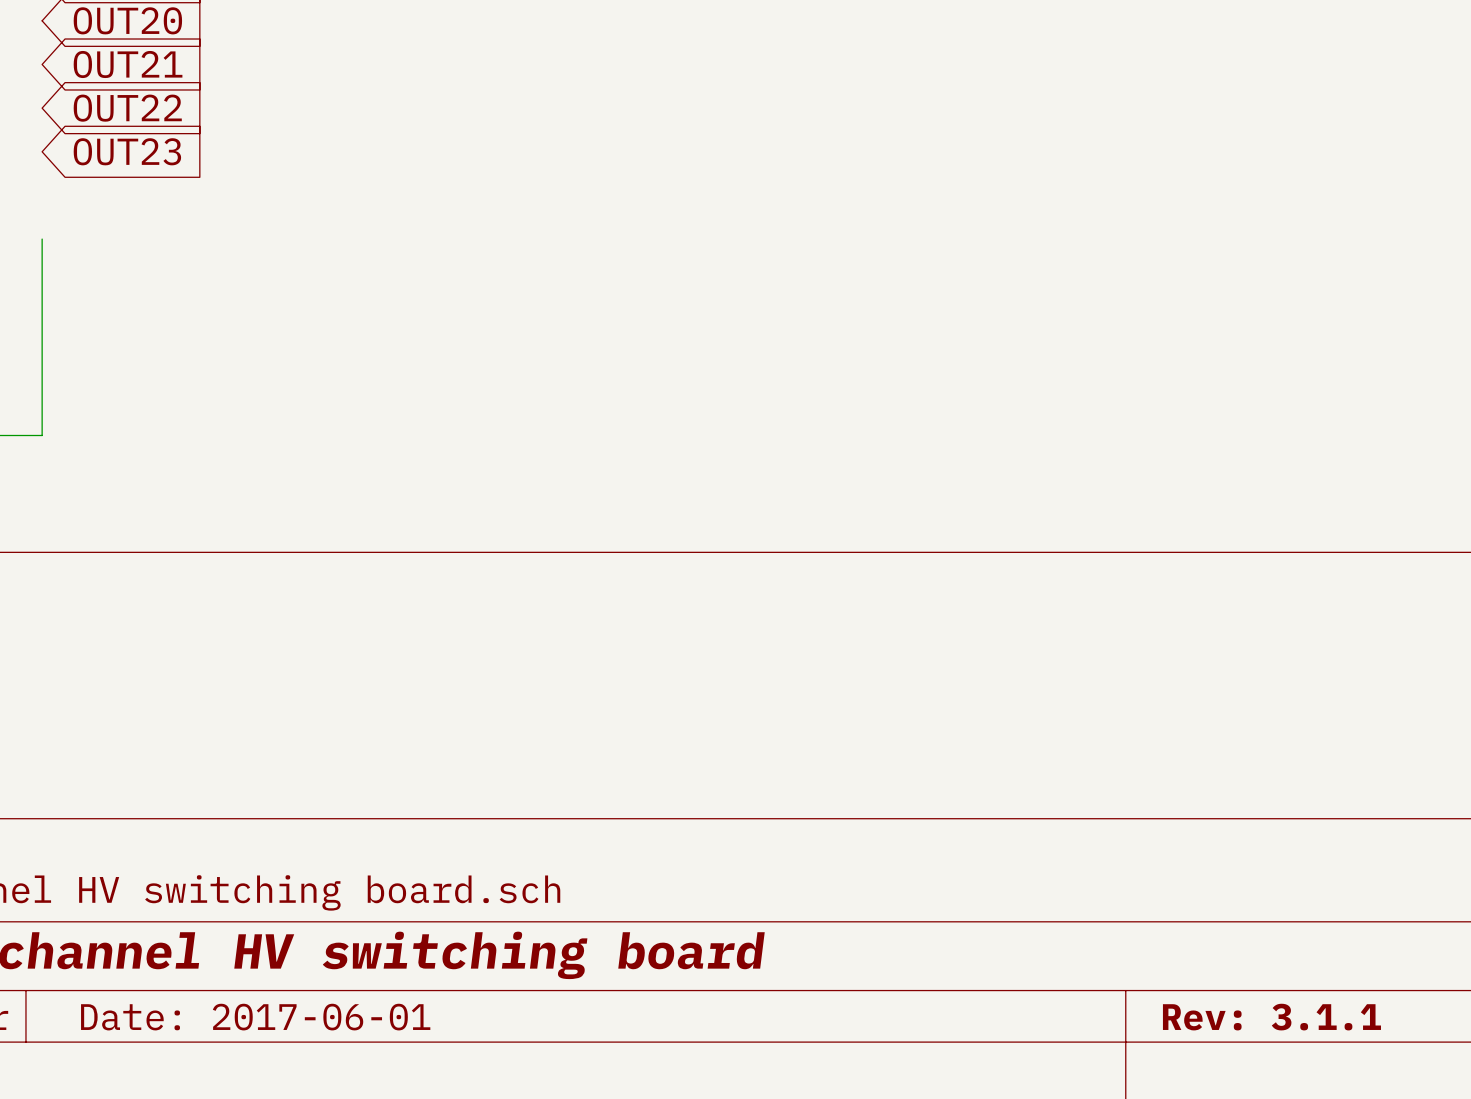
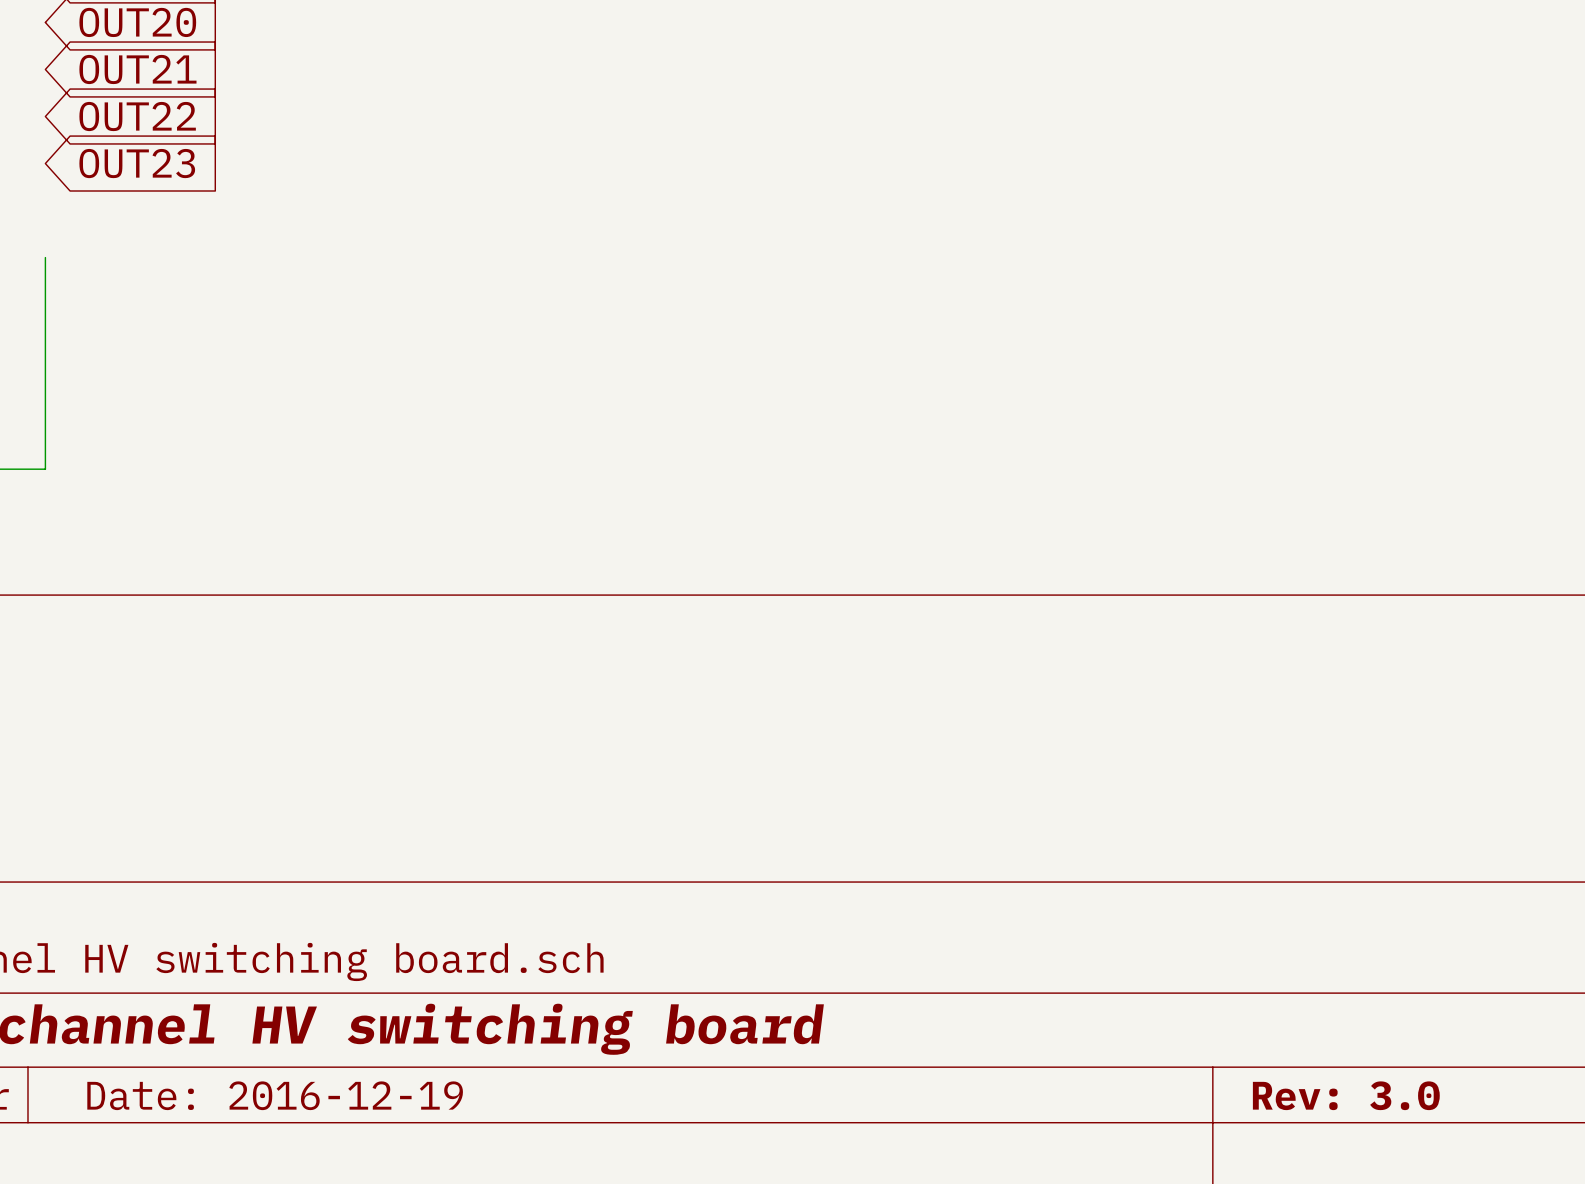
title block: Date: 2017-06-01 (255, 1017) -> Date: 2016-12-19 (275, 1095)
title block: Rev: 3.1.1 (1271, 1017) -> Rev: 3.0 (1346, 1095)

